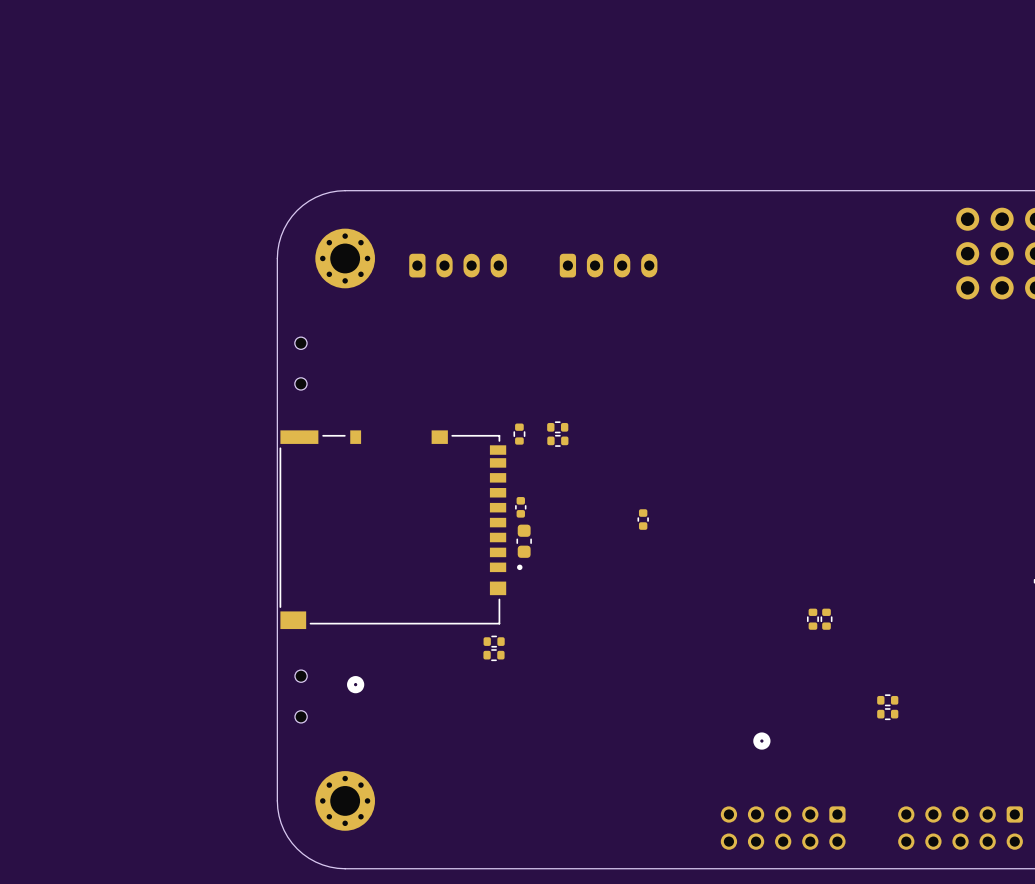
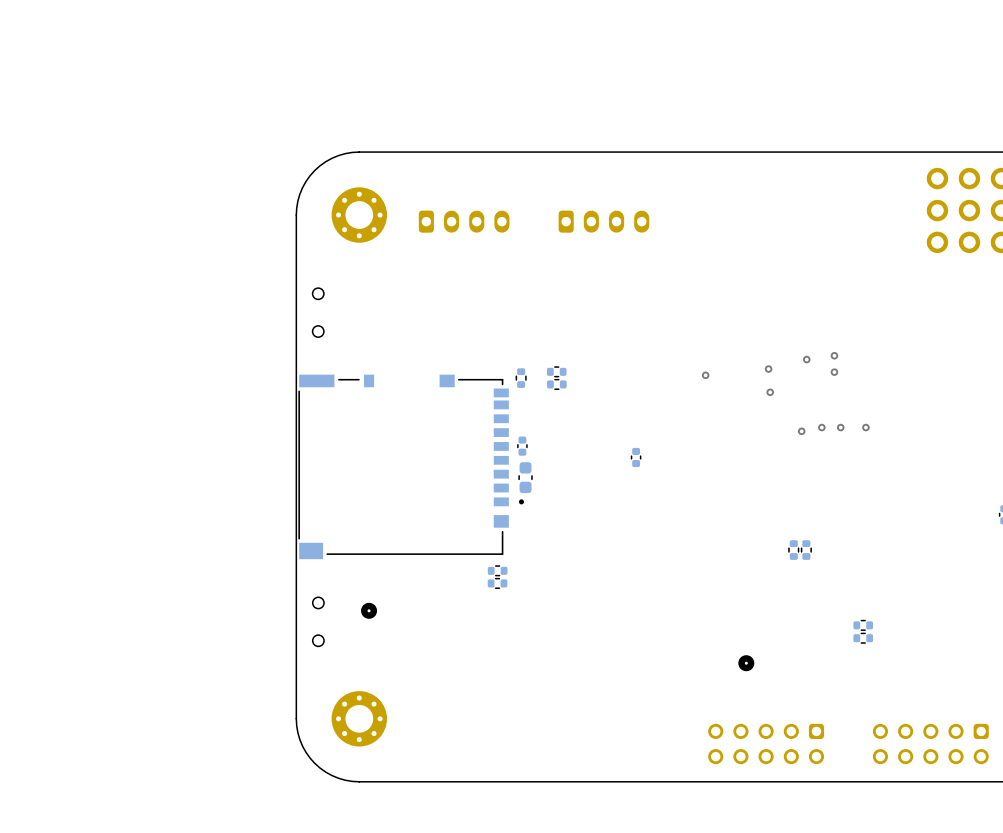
via: none -> (834, 355)
via: none -> (806, 359)
via: none -> (768, 369)
via: none -> (834, 372)
via: none -> (705, 375)
via: none -> (770, 392)
via: none -> (821, 427)
via: none -> (840, 427)
via: none -> (865, 427)
via: none -> (801, 431)

